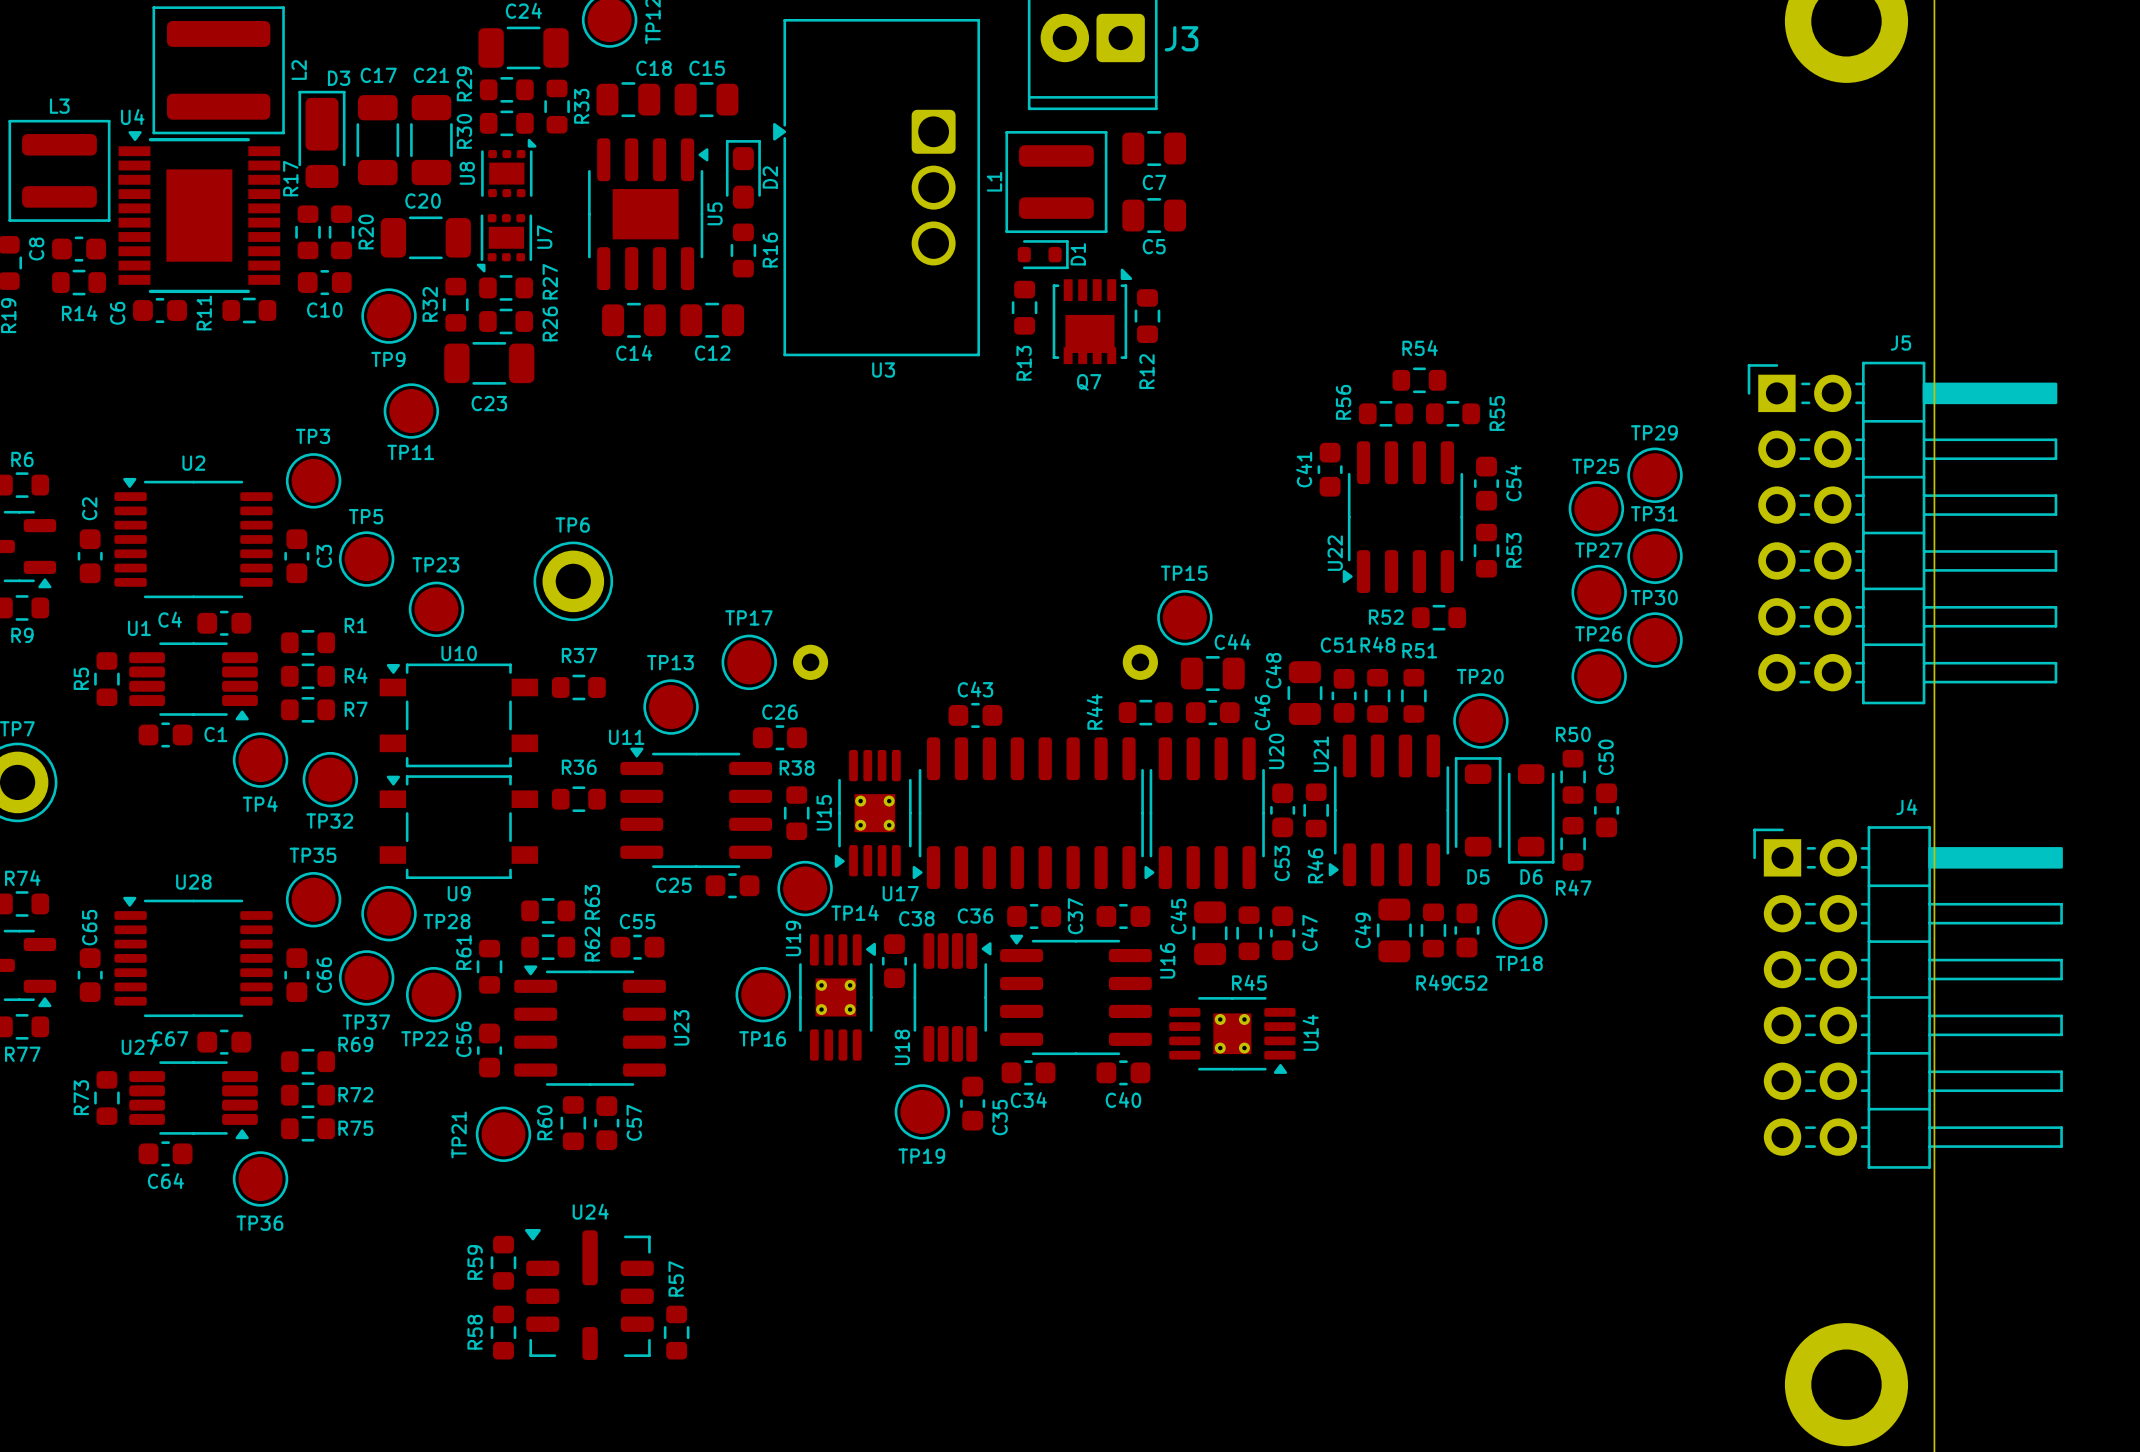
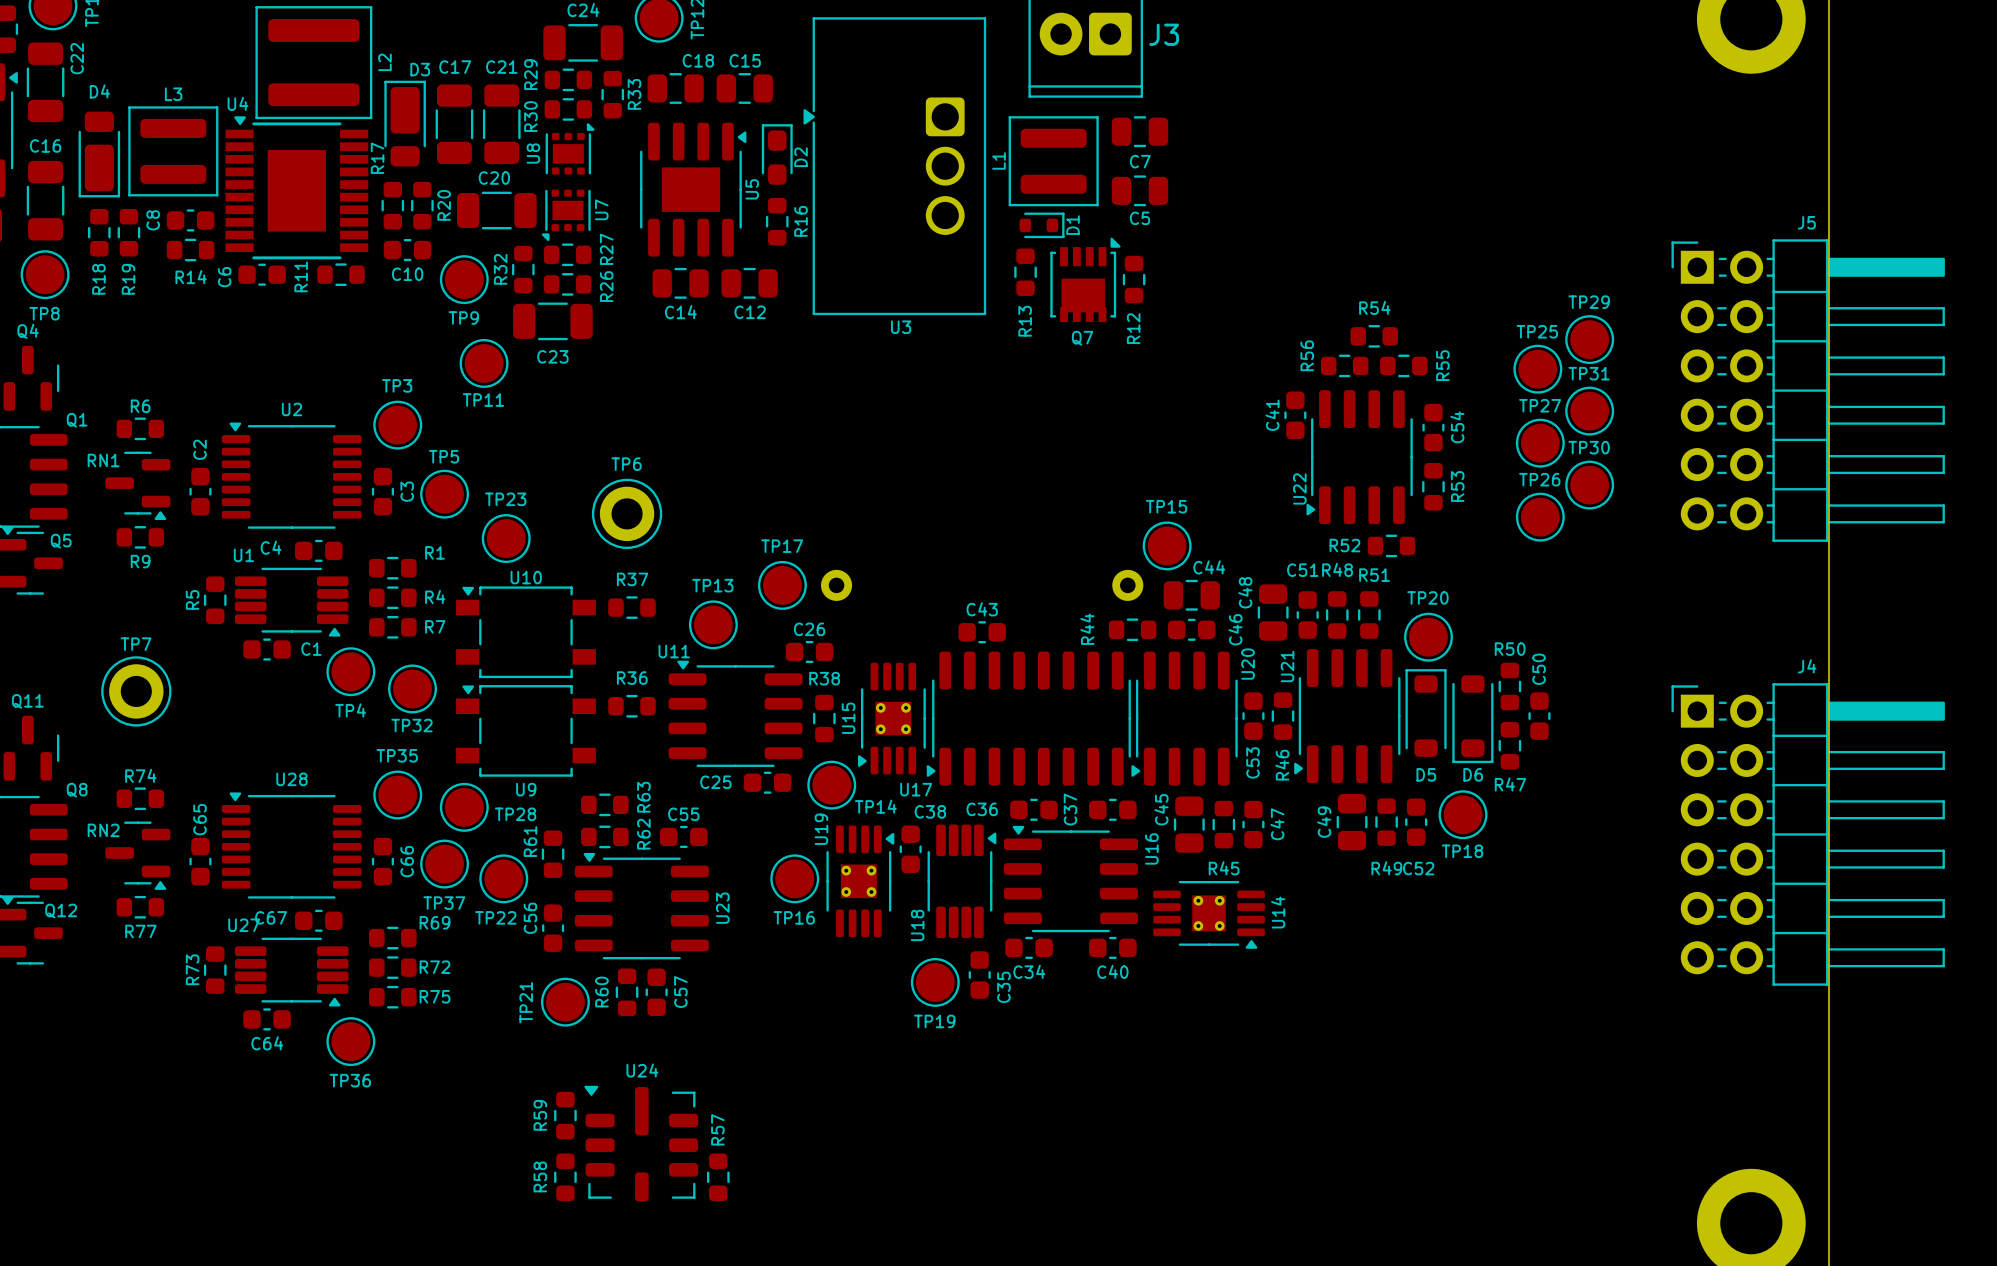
TP29 position: (1655, 475) -> (1589, 339)
TP25 position: (1596, 508) -> (1537, 369)
J5 position: (1902, 533) -> (1808, 390)
TP31 position: (1655, 556) -> (1589, 411)
TP27 position: (1599, 592) -> (1540, 443)
TP30 position: (1655, 640) -> (1589, 485)
TP26 position: (1599, 676) -> (1540, 517)
J4 position: (1908, 997) -> (1808, 834)

